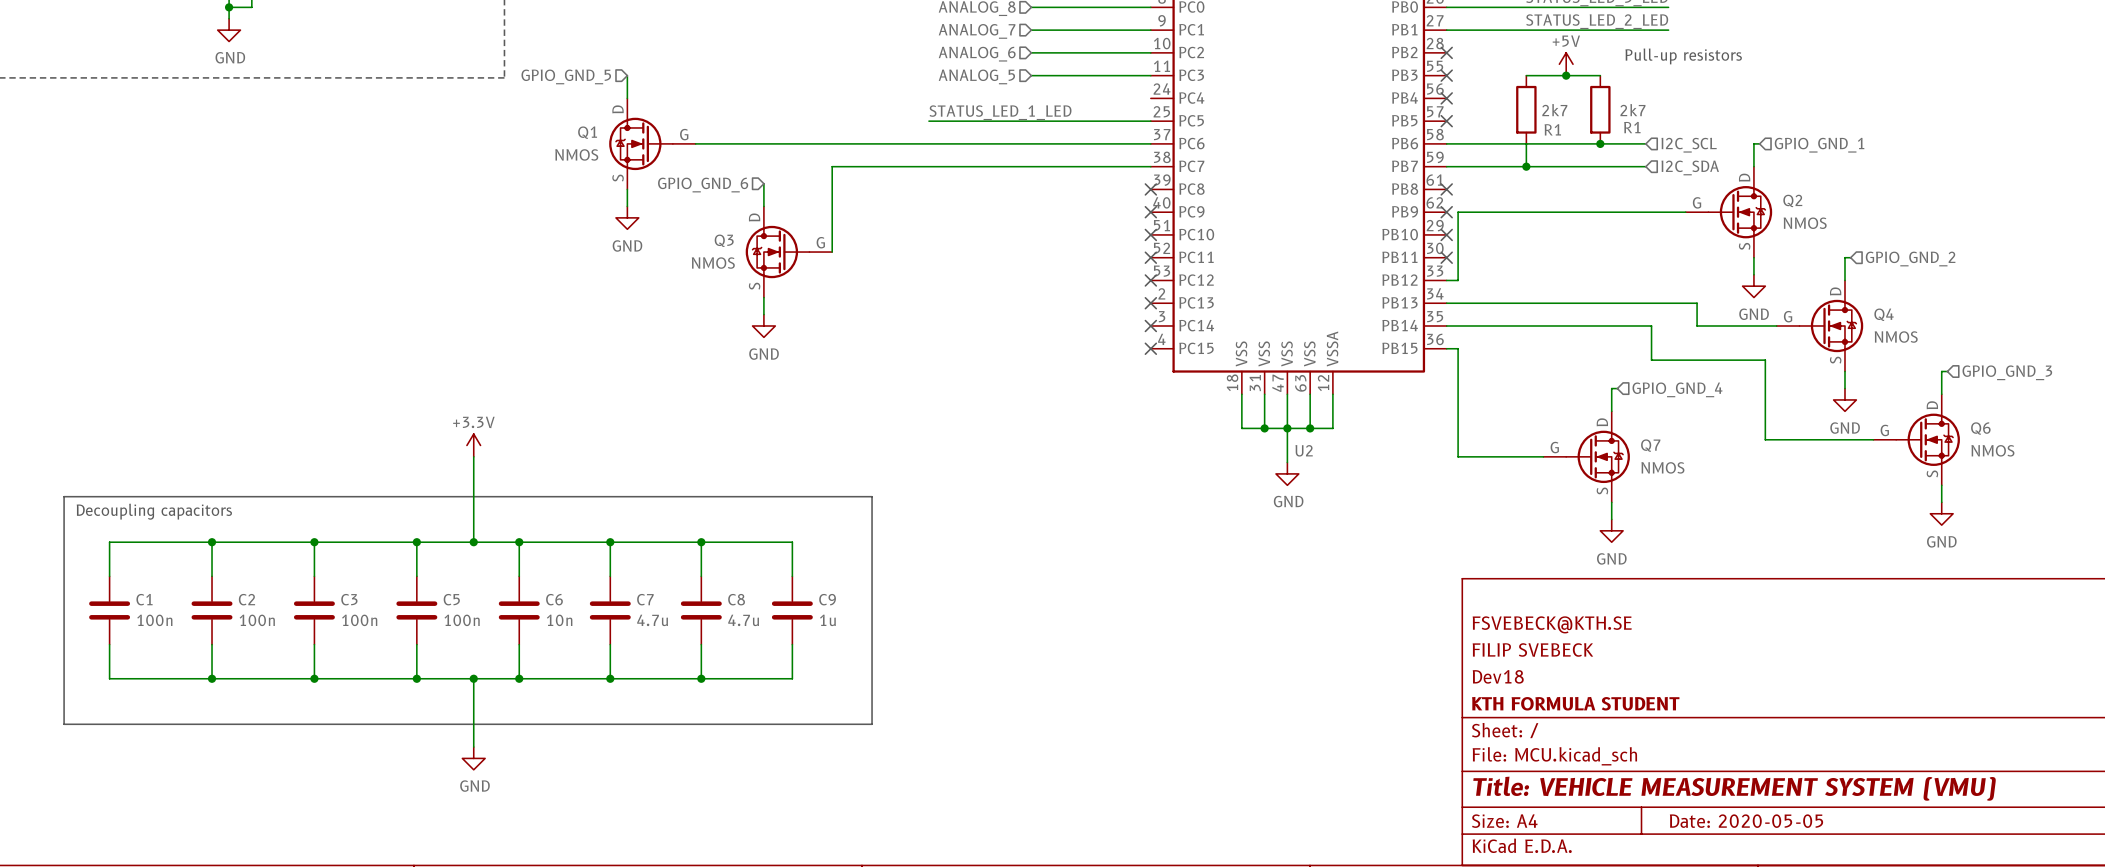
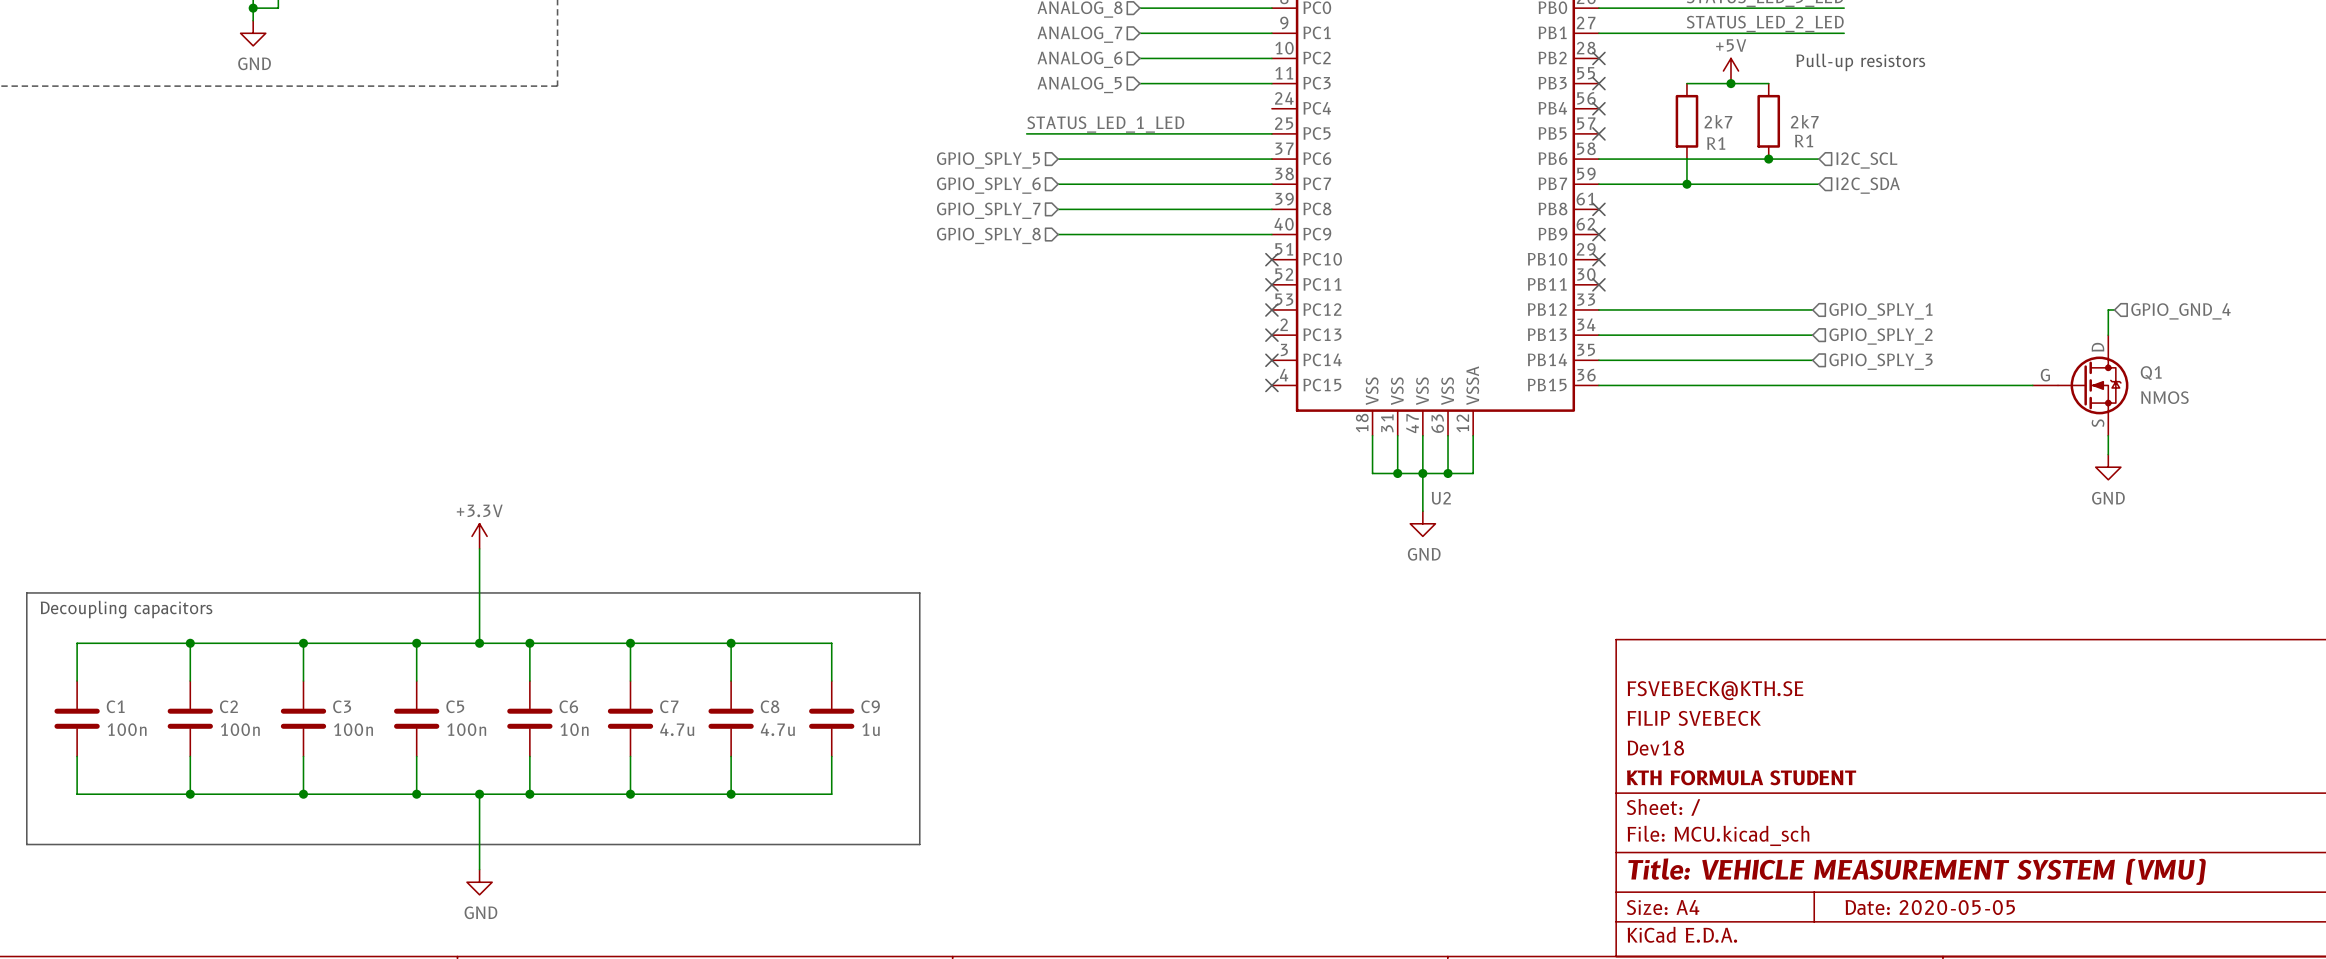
wire: (627, 75) (627, 98) -> none
hierarchical label: GPIO_GND_5 (566, 76) -> none
Q1 flip: as is (641, 143) -> left-right (2093, 385)
Q1 position: (652, 143) -> (2080, 385)
wire: (695, 143) (957, 143) -> none
wire: (1759, 143) (1753, 143) (1753, 166) -> none
hierarchical label: none -> GPIO_SPLY_5 (988, 160)
hierarchical label: GPIO_GND_1 (1819, 145) -> none
wire: (957, 166) (832, 166) (832, 252) -> none
hierarchical label: none -> GPIO_SPLY_6 (988, 185)
wire: (763, 183) (763, 206) -> none
hierarchical label: GPIO_GND_6 (703, 185) -> none
wire: (627, 189) (627, 206) -> none
wire: none -> (1058, 209) (1271, 209)
no-connect mark: (1150, 189) -> none
hierarchical label: none -> GPIO_SPLY_7 (988, 210)
wire: none -> (1058, 234) (1271, 234)
no-connect mark: (1150, 212) -> none
wire: (1685, 212) (1458, 212) (1458, 280) -> (1812, 309) (1611, 309)
Q2: NMOS (1728, 212) -> none
hierarchical label: none -> GPIO_SPLY_8 (988, 235)
power symbol: GND (627, 217) -> none
Q3: NMOS (788, 252) -> none
wire: (1753, 257) (1753, 274) -> none
wire: (1850, 257) (1844, 257) (1844, 280) -> (2114, 309) (2108, 309) (2108, 335)
hierarchical label: GPIO_GND_2 (1910, 258) -> GPIO_GND_4 (2180, 311)
hierarchical label: none -> GPIO_SPLY_1 (1881, 311)
power symbol: GND (1753, 286) -> none
wire: (763, 297) (763, 314) -> none
wire: (1640, 303) (1697, 303) (1697, 325) (1776, 325) -> none
hierarchical label: none -> GPIO_SPLY_2 (1881, 336)
power symbol: GND (763, 325) -> none
wire: (1640, 325) (1651, 325) (1651, 360) (1765, 360) (1765, 439) (1873, 439) -> none
Q4: NMOS (1819, 325) -> none
hierarchical label: none -> GPIO_SPLY_3 (1881, 361)
wire: (1458, 348) (1458, 456) (1543, 456) -> (1611, 385) (2032, 385)
wire: (1844, 371) (1844, 388) -> (2108, 435) (2108, 454)
wire: (1947, 371) (1941, 371) (1941, 394) -> none
hierarchical label: GPIO_GND_3 (2007, 372) -> none
wire: (1617, 388) (1611, 388) (1611, 411) -> none
hierarchical label: GPIO_GND_4 (1677, 389) -> none
power symbol: GND (1844, 399) -> none
power symbol: none -> GND (2108, 467)
Q6: NMOS (1916, 439) -> none
power symbol position: +3.3V (473, 445) -> +3.3V (479, 536)
wire: (473, 456) (473, 542) -> (479, 548) (479, 643)
Q7: NMOS (1586, 456) -> none
wire: (1941, 485) (1941, 502) -> none
line: (64, 496) (872, 496) (872, 724) (64, 724) (64, 496) -> (26, 592) (919, 592) (919, 844) (26, 844) (26, 592)
wire: (1611, 502) (1611, 519) -> none
text position: Decoupling capacitors (154, 511) -> Decoupling capacitors (126, 609)
power symbol: GND (1941, 513) -> none
power symbol: GND (1611, 530) -> none
wire: (212, 542) (212, 576) -> (190, 643) (190, 681)
junction: (212, 542) -> none
wire: (314, 542) (314, 576) -> (303, 643) (303, 681)
junction: (314, 542) -> none
wire: (416, 542) (416, 576) -> (416, 643) (416, 681)
junction: (416, 542) -> none
junction: (473, 542) -> none
wire: (519, 542) (519, 576) -> (529, 643) (529, 681)
junction: (519, 542) -> none
wire: (610, 542) (610, 576) -> (630, 643) (630, 681)
junction: (610, 542) -> none
wire: (701, 542) (701, 576) -> (731, 643) (731, 681)
junction: (701, 542) -> none
wire: (109, 576) (109, 542) (792, 542) (792, 576) -> (77, 681) (77, 643) (831, 643) (831, 681)
junction: none -> (190, 643)
junction: none -> (303, 643)
junction: none -> (416, 643)
junction: none -> (479, 643)
junction: none -> (529, 643)
junction: none -> (630, 643)
junction: none -> (731, 643)
C1 position: (109, 610) -> (77, 718)
C2 position: (212, 610) -> (190, 718)
C3 position: (314, 610) -> (303, 718)
C5 position: (416, 610) -> (416, 718)
C6 position: (519, 610) -> (529, 718)
C7 position: (610, 610) -> (630, 718)
C8 position: (701, 610) -> (731, 718)
C9 position: (792, 610) -> (831, 718)
wire: (109, 644) (109, 678) (792, 678) (792, 644) -> (77, 756) (77, 794) (831, 794) (831, 756)
wire: (212, 644) (212, 678) -> (190, 756) (190, 794)
wire: (314, 644) (314, 678) -> (303, 756) (303, 794)
wire: (416, 644) (416, 678) -> (416, 756) (416, 794)
wire: (519, 644) (519, 678) -> (529, 756) (529, 794)
wire: (610, 644) (610, 678) -> (630, 756) (630, 794)
wire: (701, 644) (701, 678) -> (731, 756) (731, 794)
junction: (212, 678) -> none
junction: (314, 678) -> none
junction: (416, 678) -> none
wire: (473, 678) (473, 747) -> (479, 794) (479, 869)
junction: (473, 678) -> none
junction: (519, 678) -> none
junction: (610, 678) -> none
junction: (701, 678) -> none
junction: none -> (190, 794)
junction: none -> (303, 794)
junction: none -> (416, 794)
junction: none -> (479, 794)
junction: none -> (529, 794)
junction: none -> (630, 794)
junction: none -> (731, 794)
power symbol position: GND (473, 758) -> GND (479, 882)

